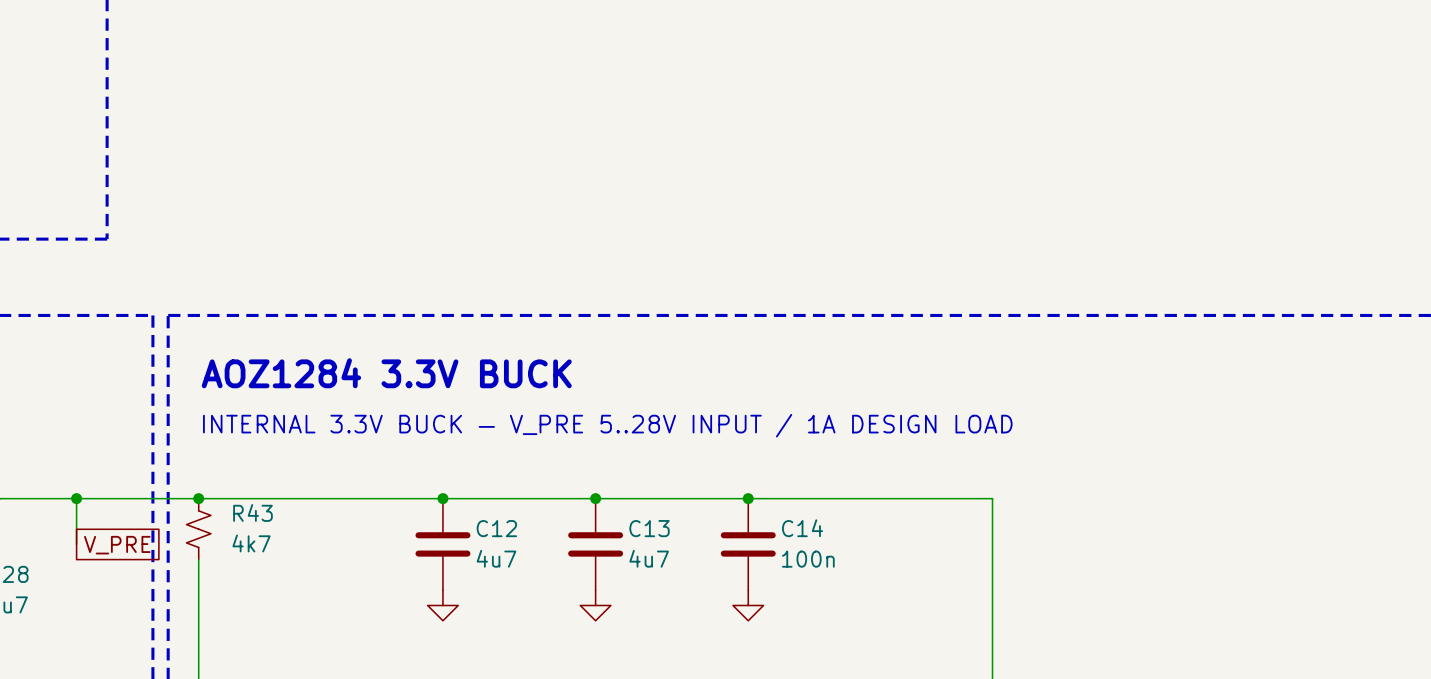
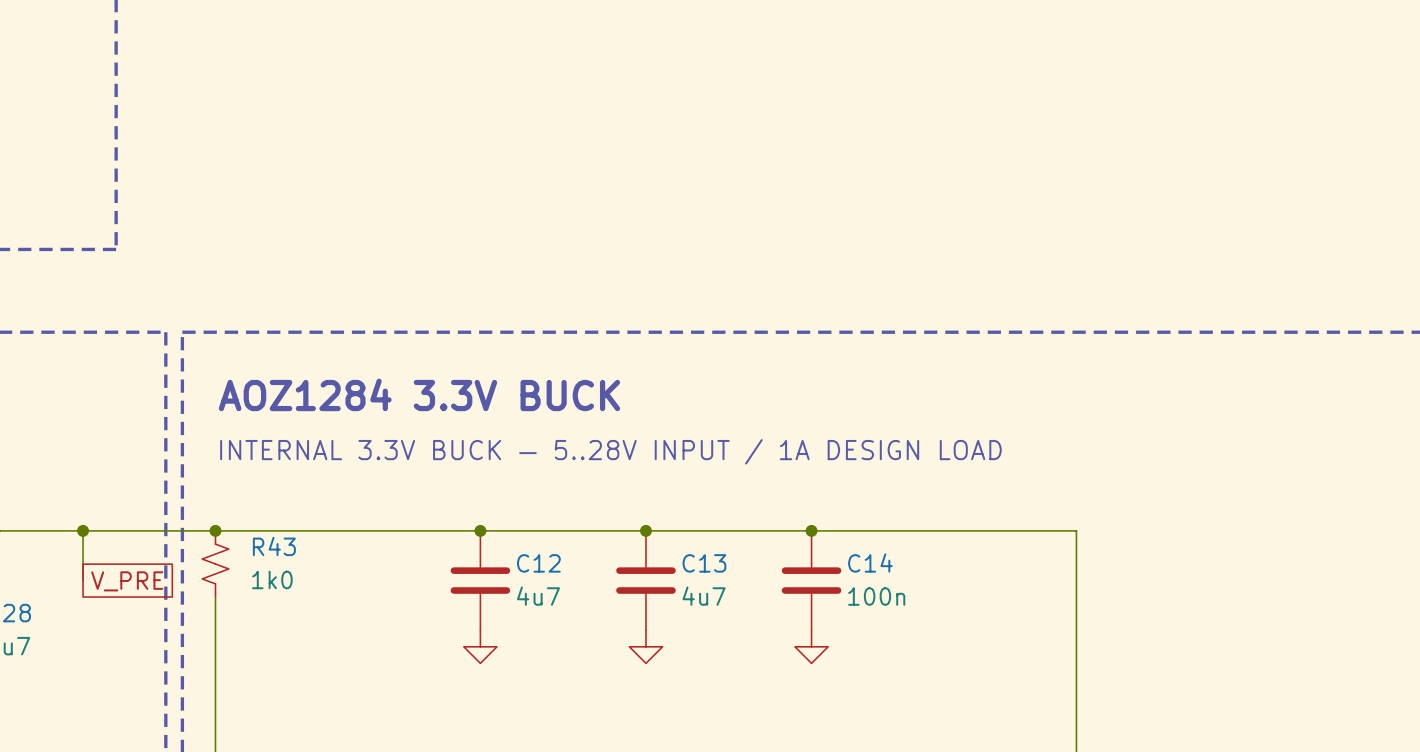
text: INTERNAL 3.3V BUCK — V_PRE 5..28V INPUT / 1A DESIGN LOAD (607, 425) -> INTERNAL 3.3V BUCK — 5..28V INPUT / 1A DESIGN LOAD (610, 451)
R43 value: 4k7 (251, 543) -> 1k0 (272, 579)

